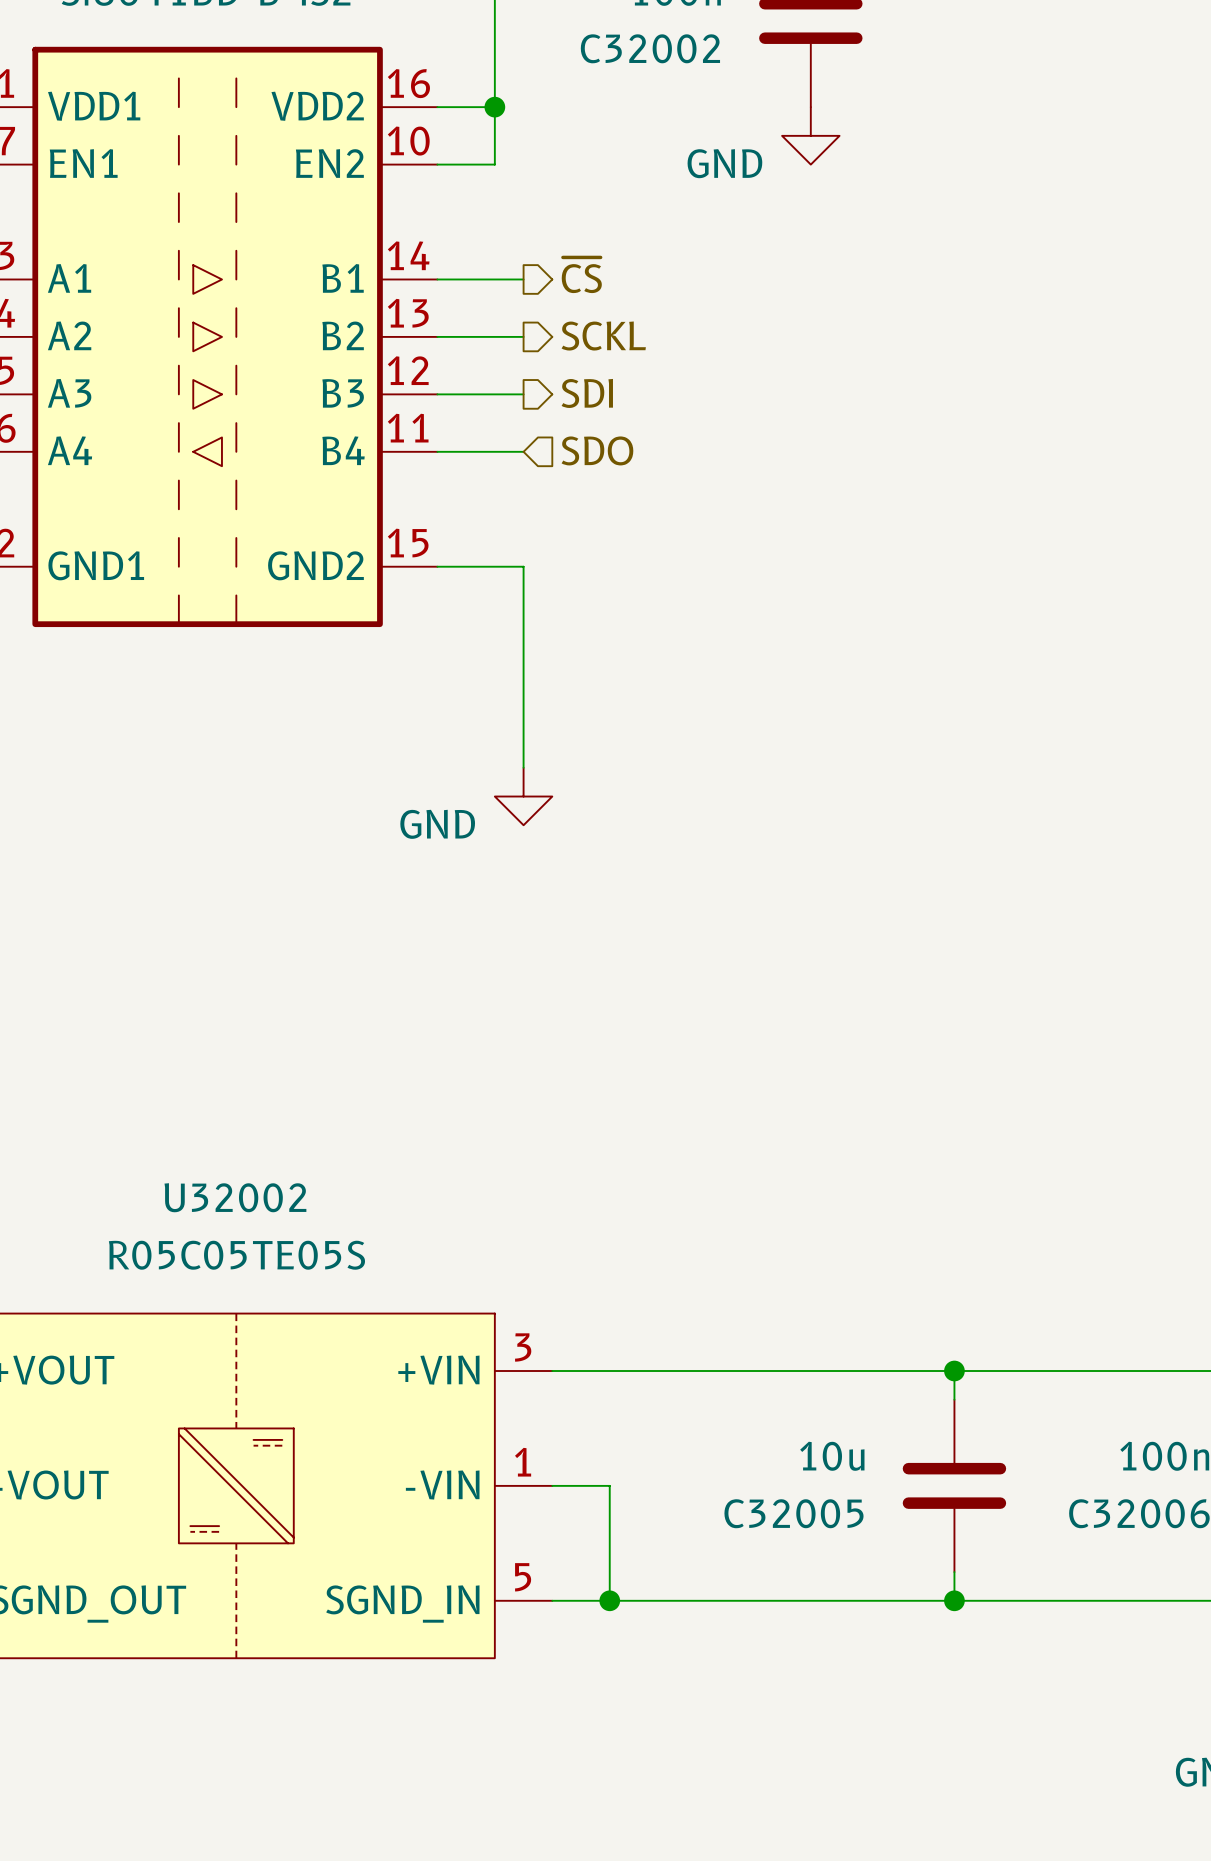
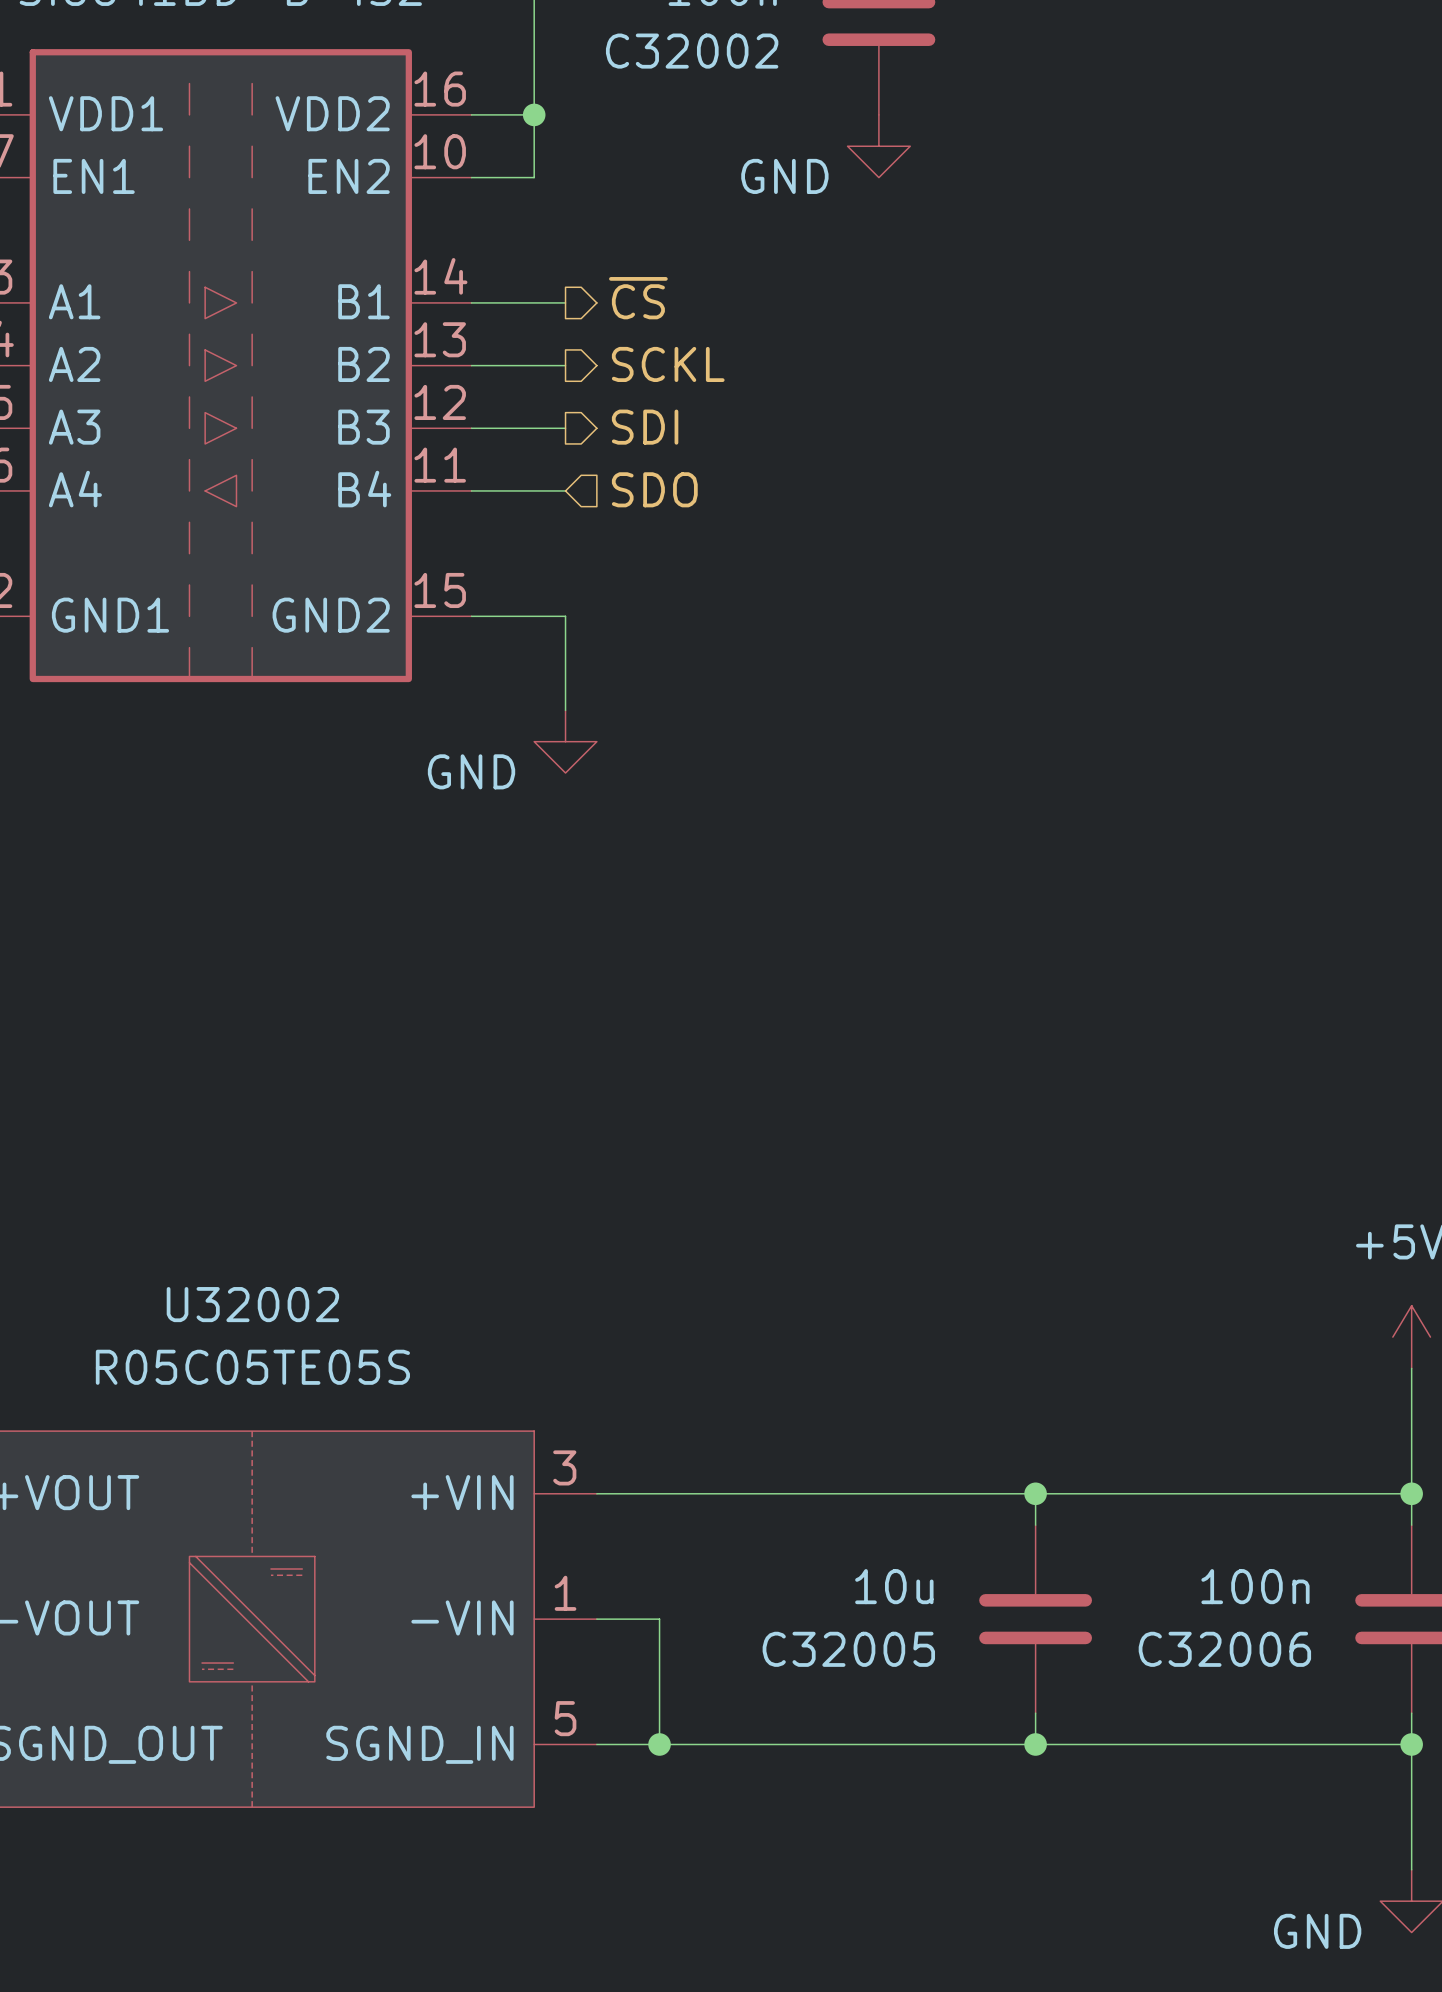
wire: (523, 652) (523, 767) -> none
power symbol position: GND (523, 796) -> GND (565, 741)

